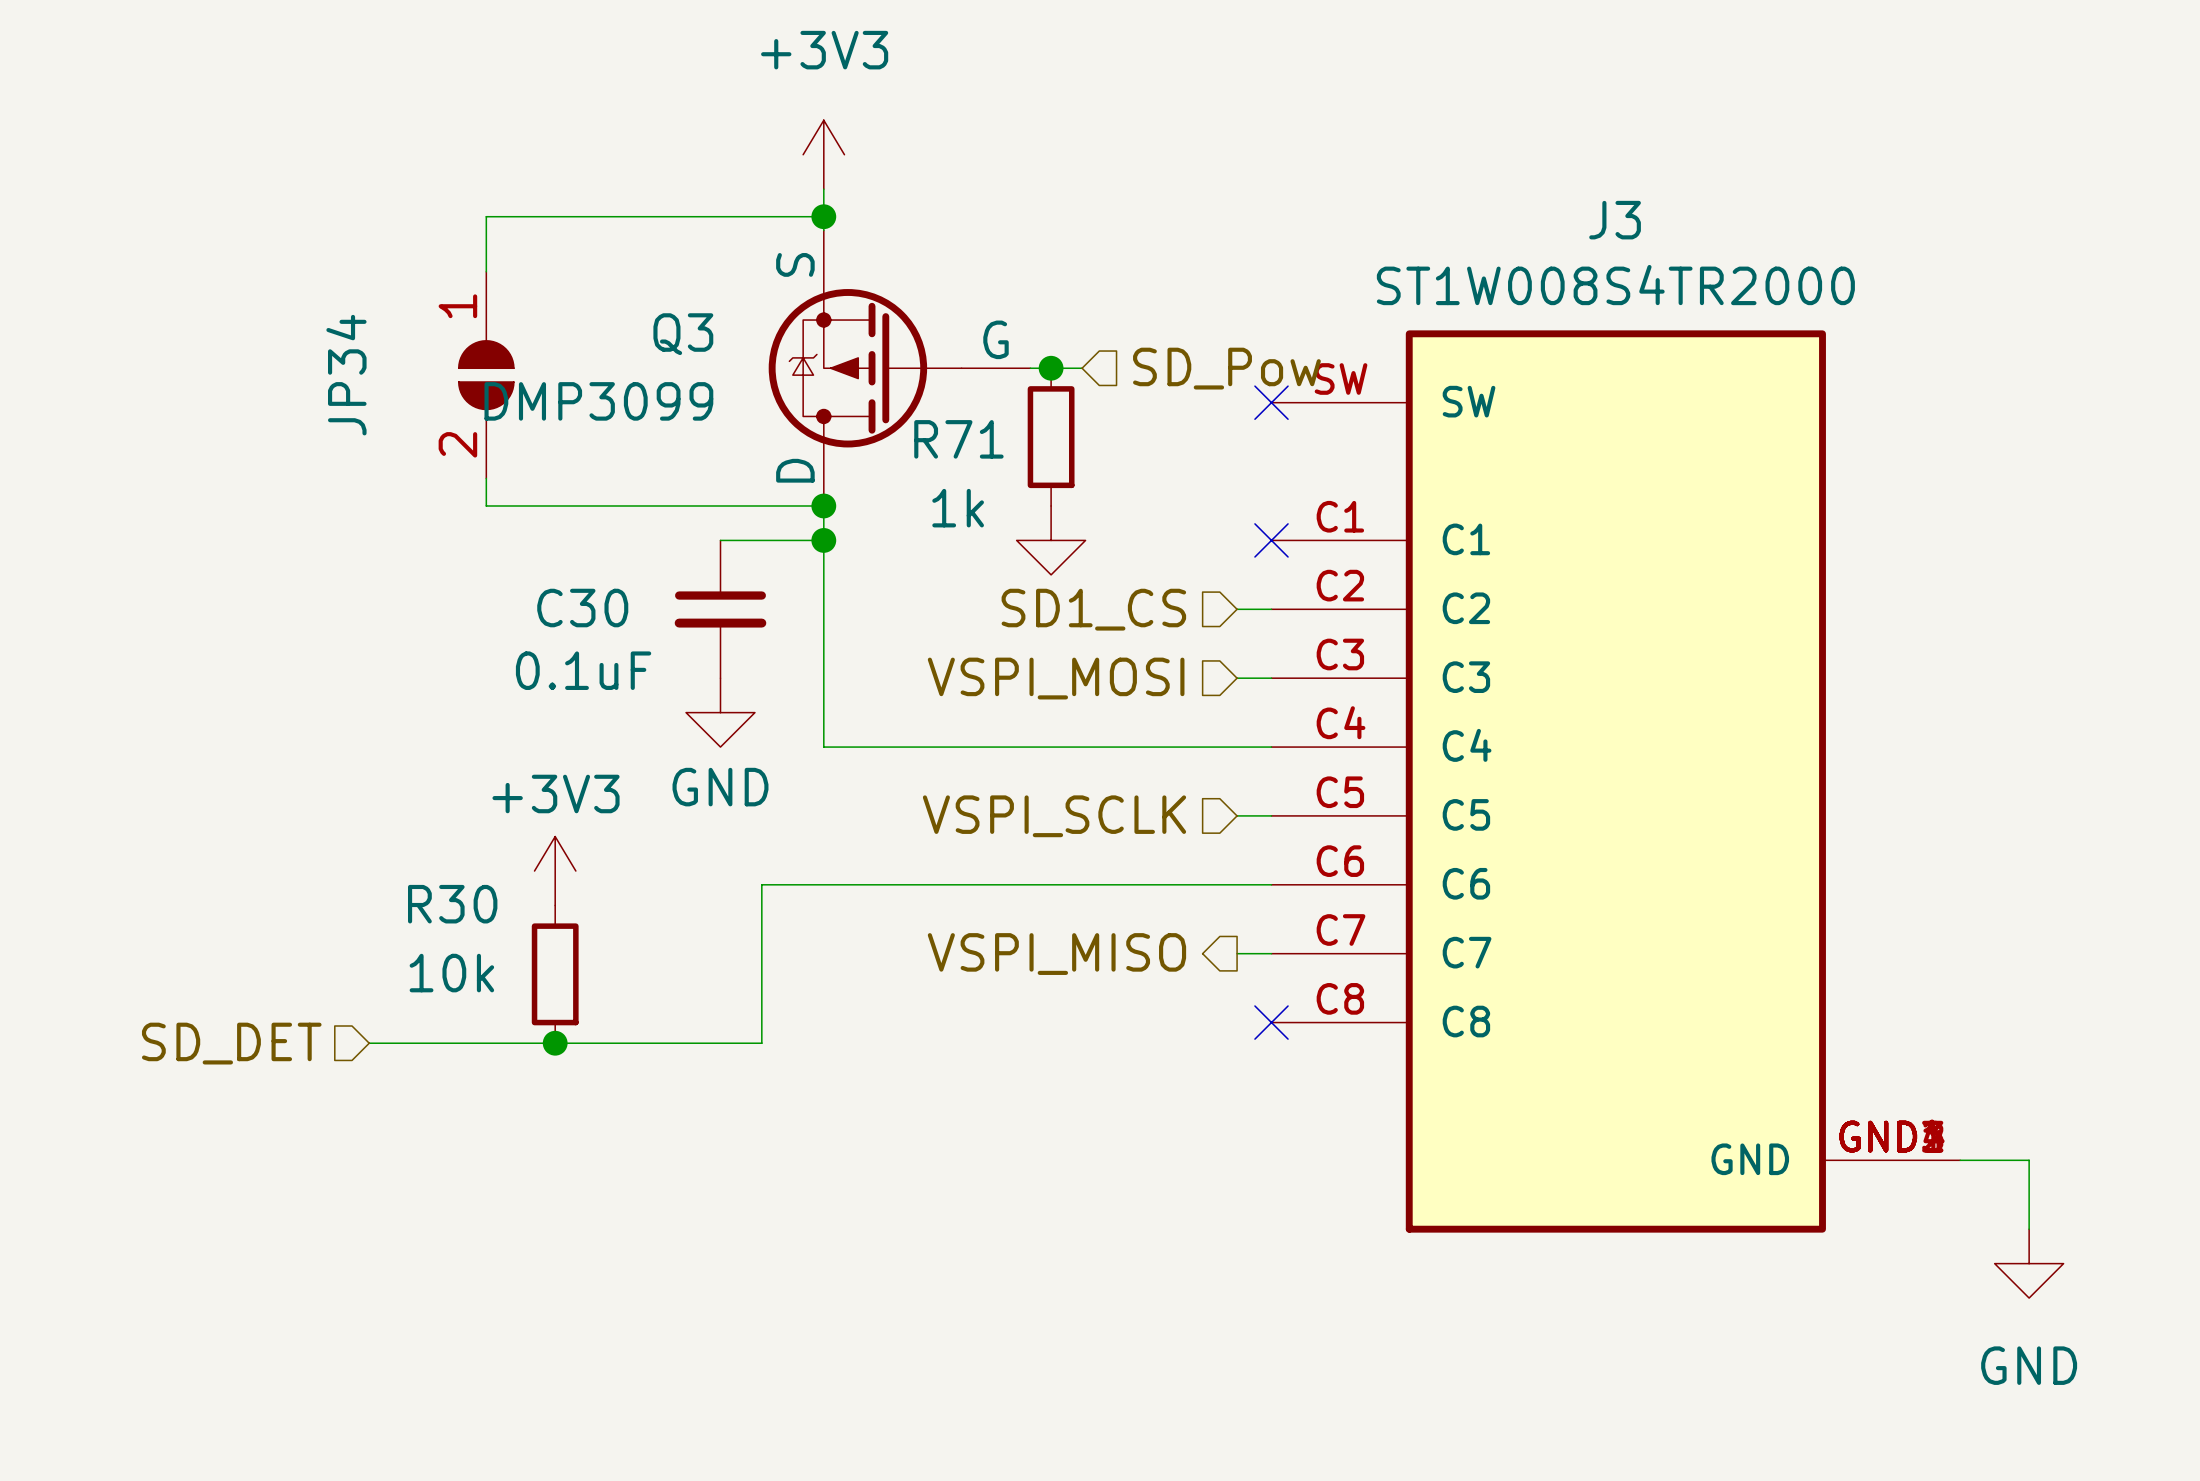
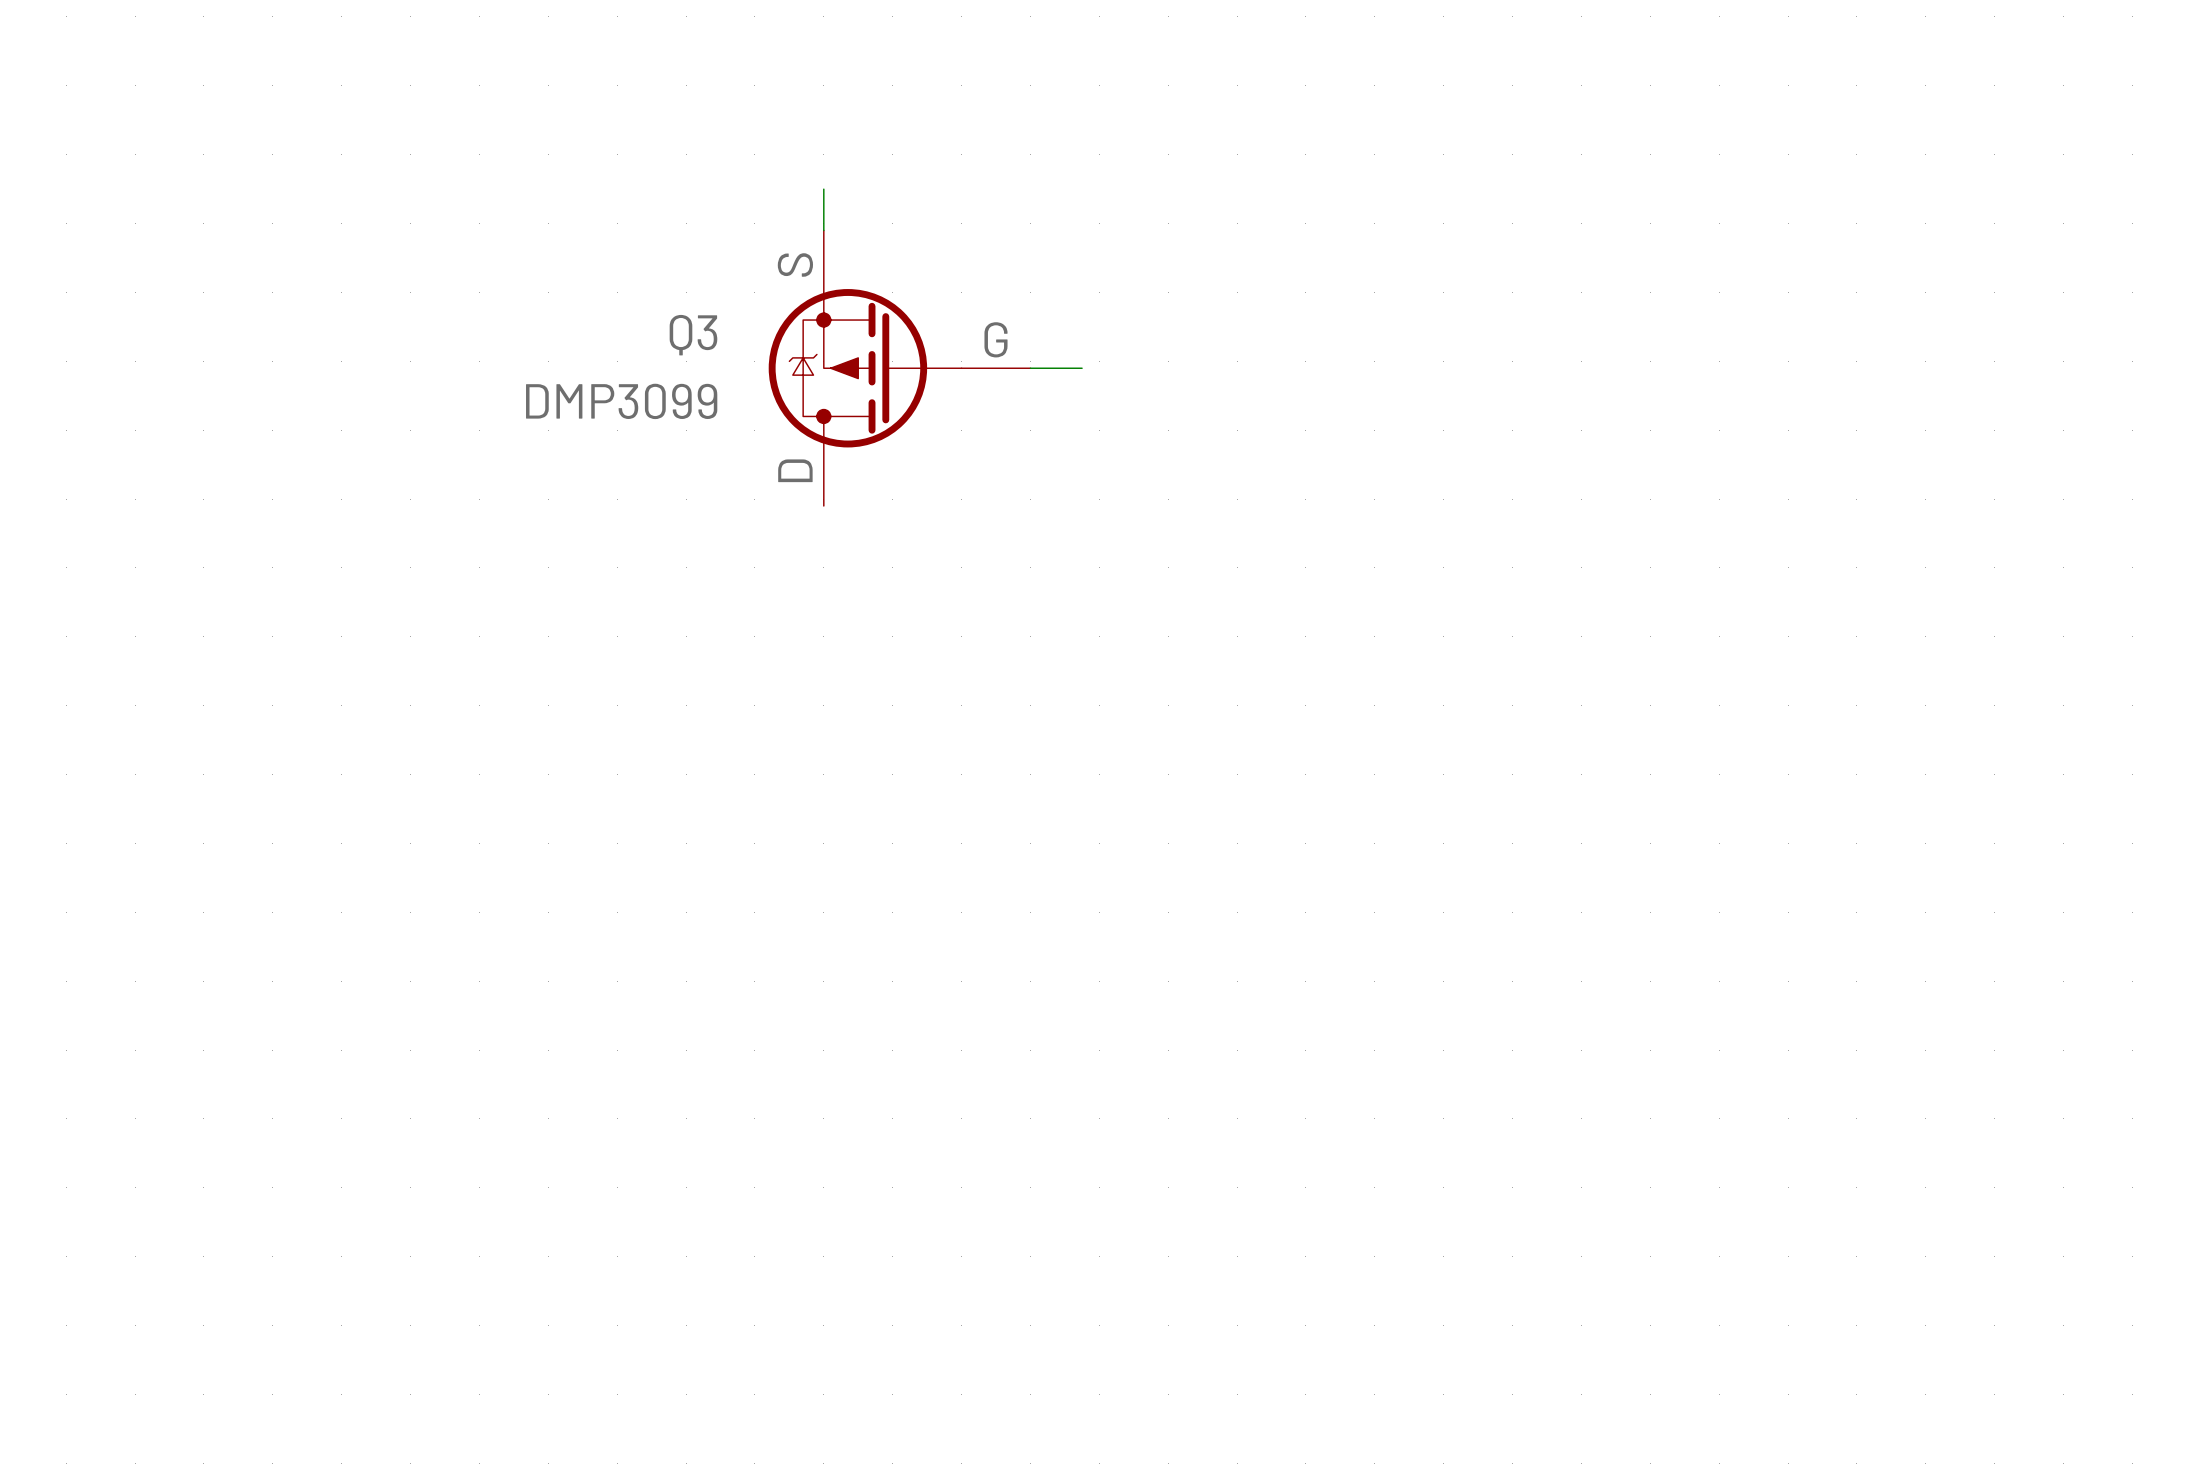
power symbol: +3V3 (823, 154) -> none
wire: (823, 216) (486, 216) (486, 271) -> none
junction: (823, 216) -> none
junction: (1051, 368) -> none
hierarchical label: SD_Pow (1226, 368) -> none
JP34: (486, 375) -> none
no-connect mark: (1271, 402) -> none
R71: 1k (1051, 437) -> none
wire: (486, 478) (486, 505) (823, 505) (823, 747) (1271, 747) -> none
junction: (823, 505) -> none
wire: (720, 540) (823, 540) -> none
junction: (823, 540) -> none
power symbol: (1051, 540) -> none
no-connect mark: (1271, 540) -> none
C30: 0.1uF (720, 609) -> none
hierarchical label: SD1_CS (1093, 609) -> none
wire: (1237, 609) (1271, 609) -> none
hierarchical label: VSPI_MOSI (1056, 678) -> none
wire: (1237, 678) (1271, 678) -> none
power symbol: GND (720, 712) -> none
J3: ST1W008S4TR2000 (1615, 781) -> none
wire: (1237, 815) (1271, 815) -> none
hierarchical label: VSPI_SCLK (1054, 816) -> none
power symbol: +3V3 (555, 871) -> none
wire: (1271, 884) (761, 884) (761, 1043) (369, 1043) -> none
wire: (1237, 953) (1271, 953) -> none
hierarchical label: VSPI_MISO (1056, 954) -> none
R30: 10k (555, 974) -> none
no-connect mark: (1271, 1022) -> none
hierarchical label: SD_DET (231, 1043) -> none
junction: (555, 1043) -> none
wire: (1960, 1160) (2029, 1160) (2029, 1229) -> none
power symbol: GND (2029, 1263) -> none

